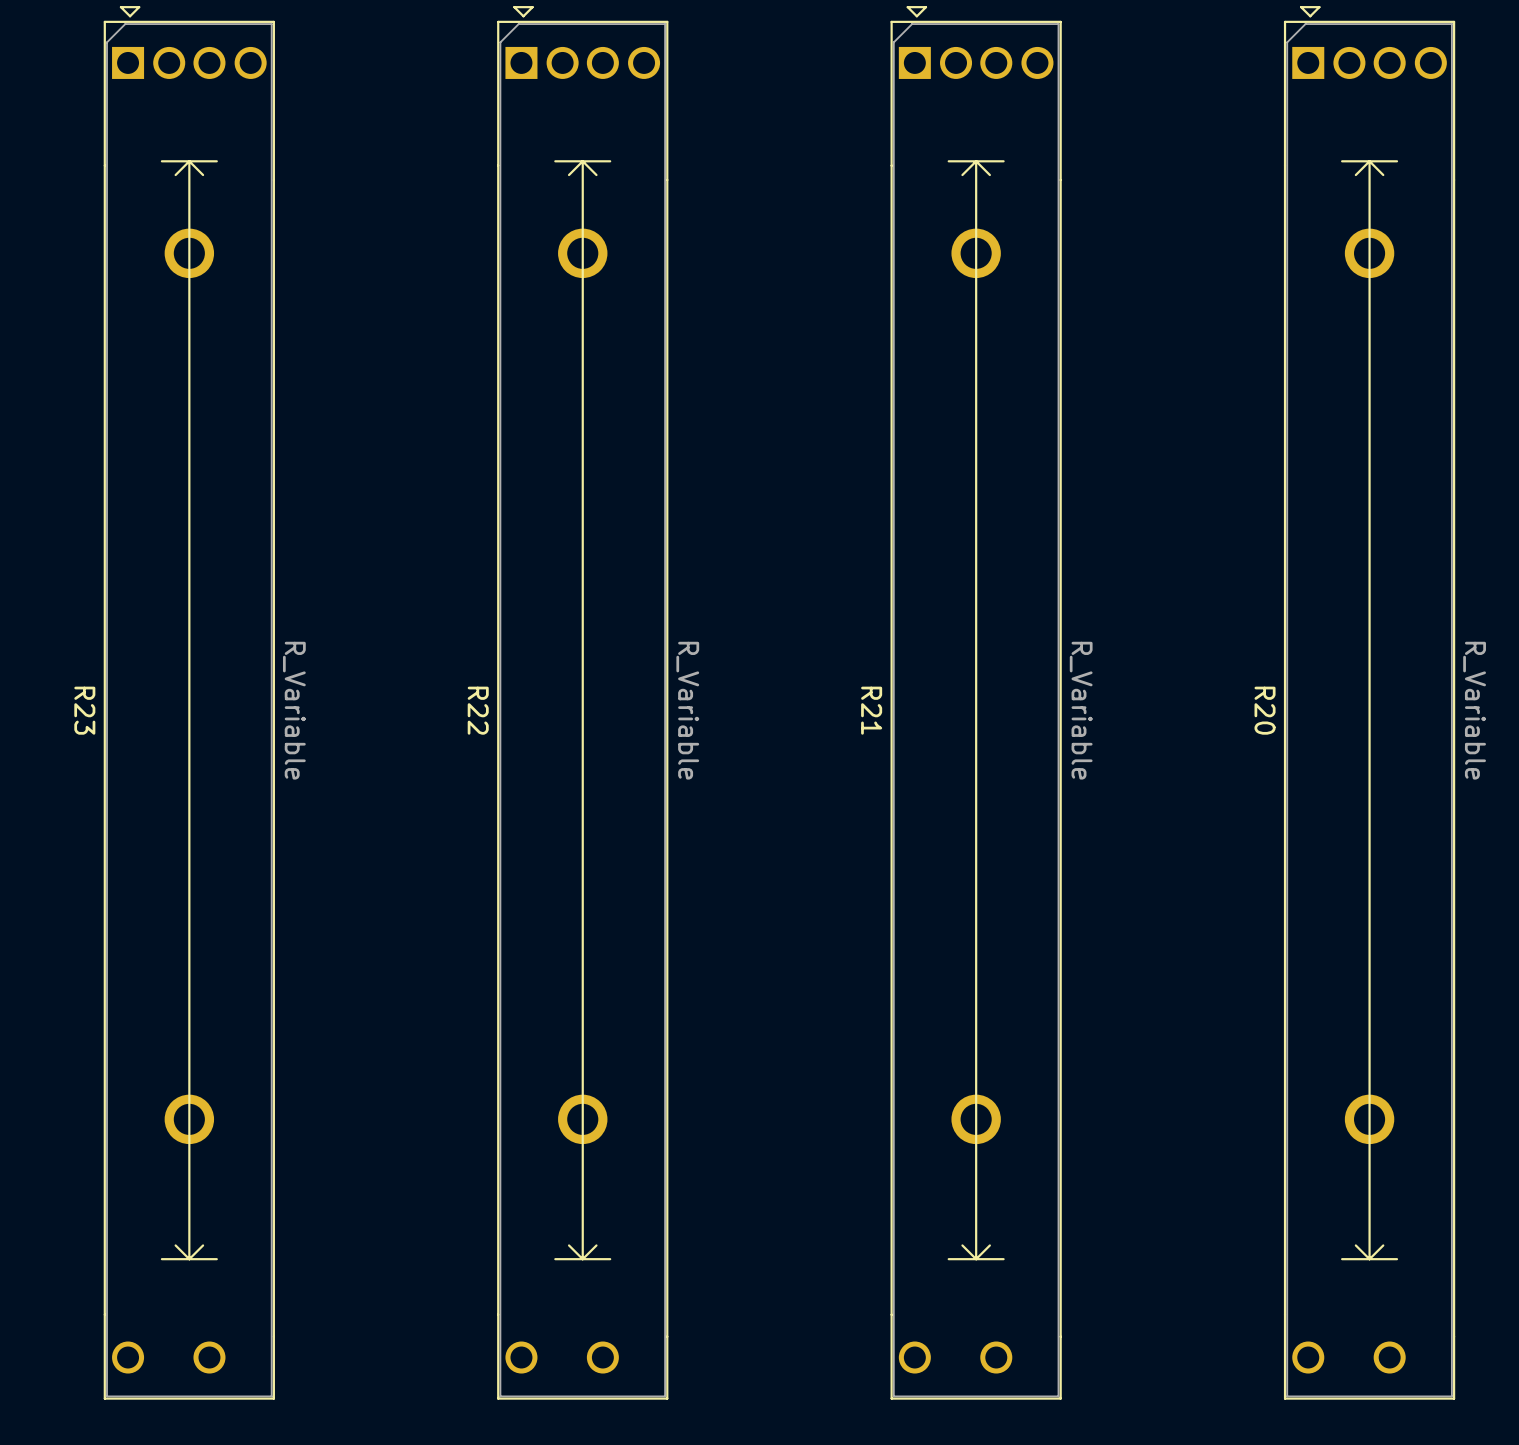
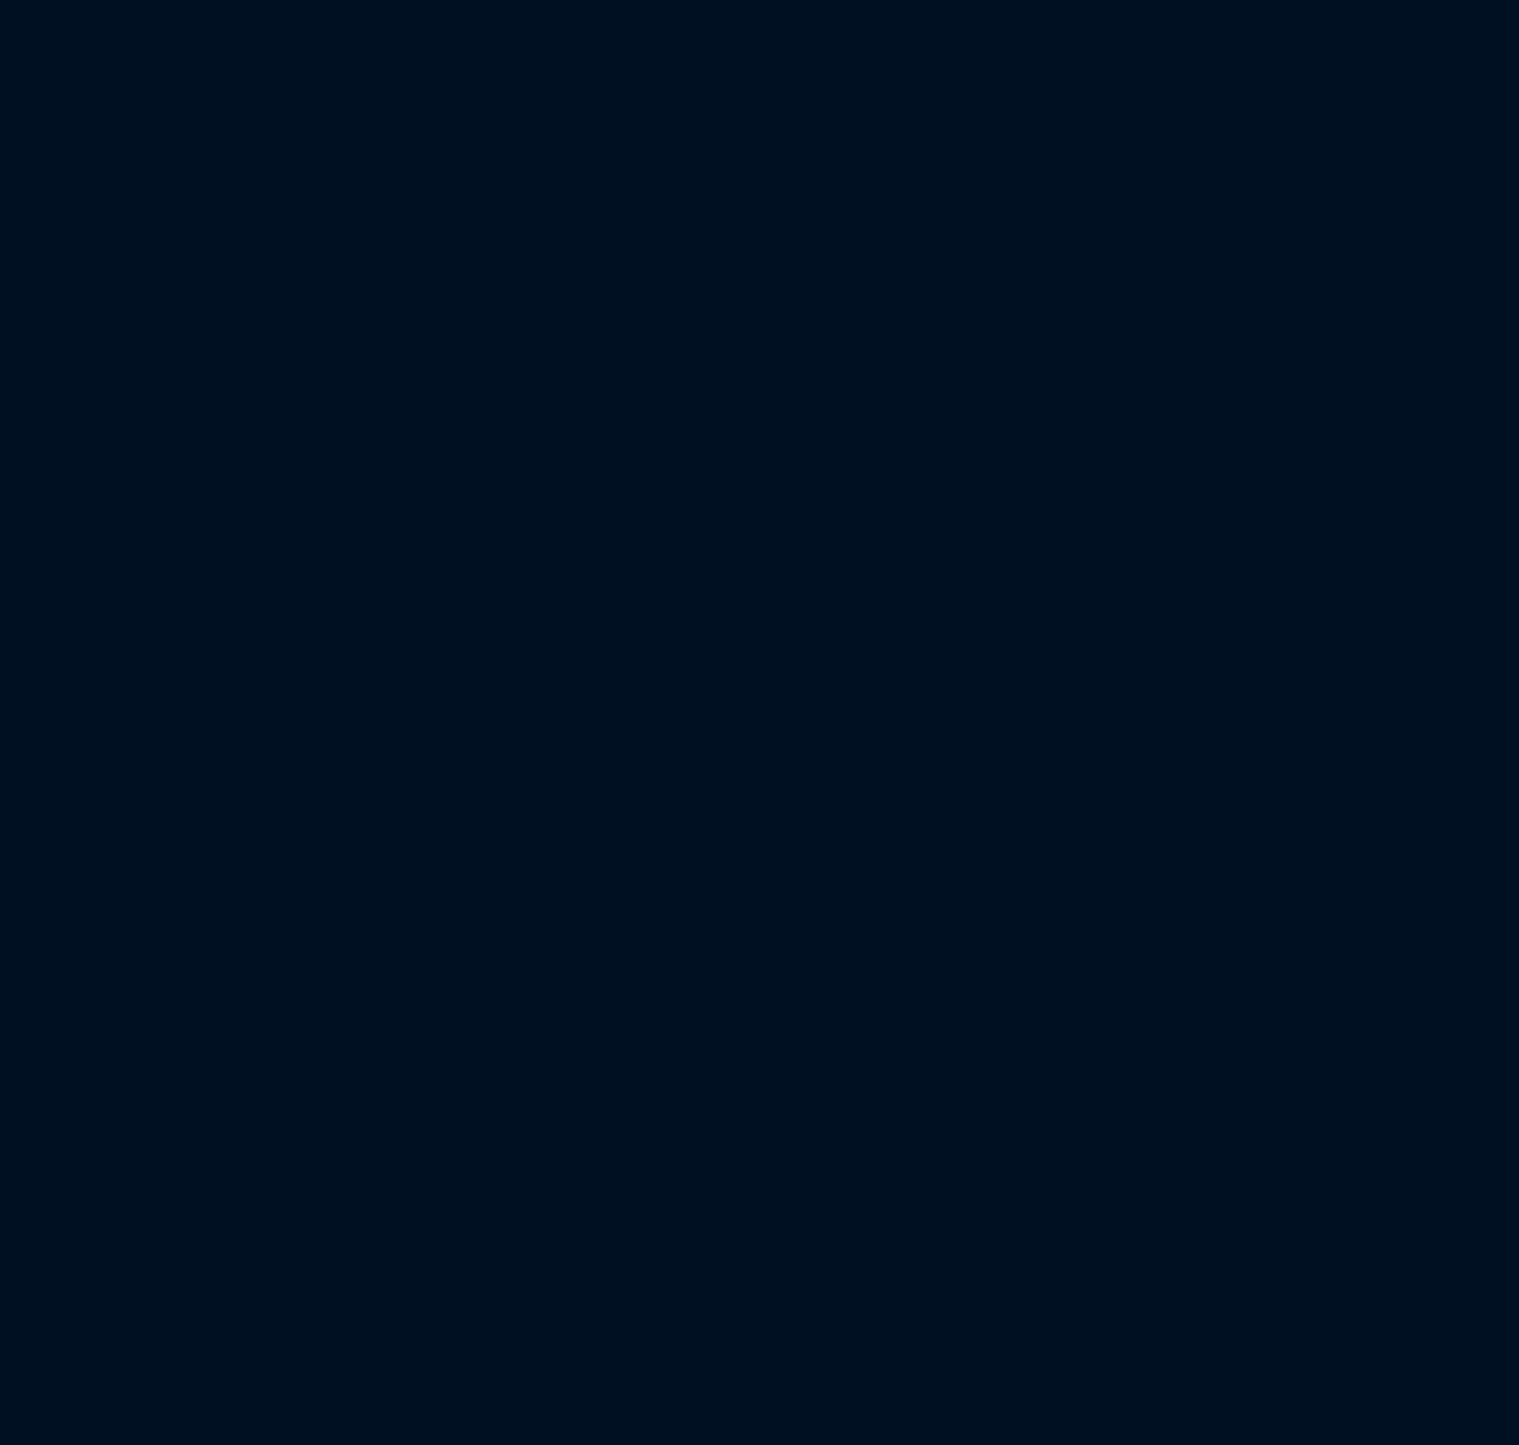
R23: R_Variable (189, 702) -> none
R22: R_Variable (582, 702) -> none
R21: R_Variable (976, 702) -> none
R20: R_Variable (1369, 702) -> none

